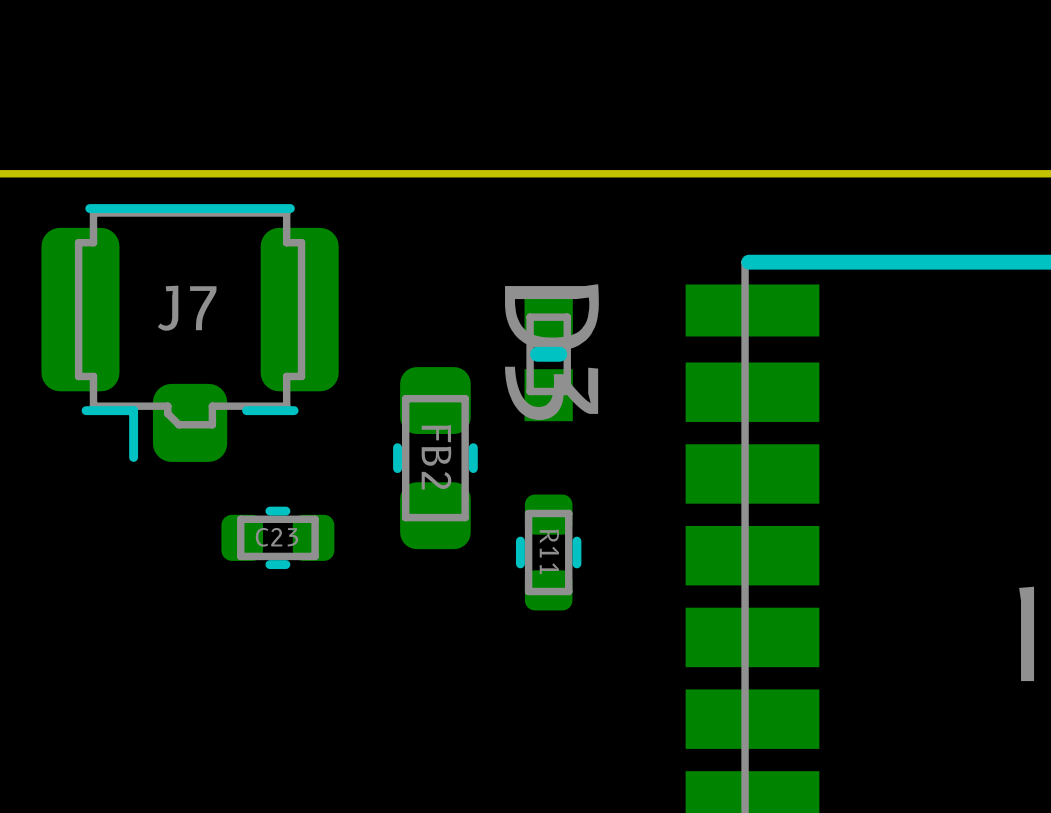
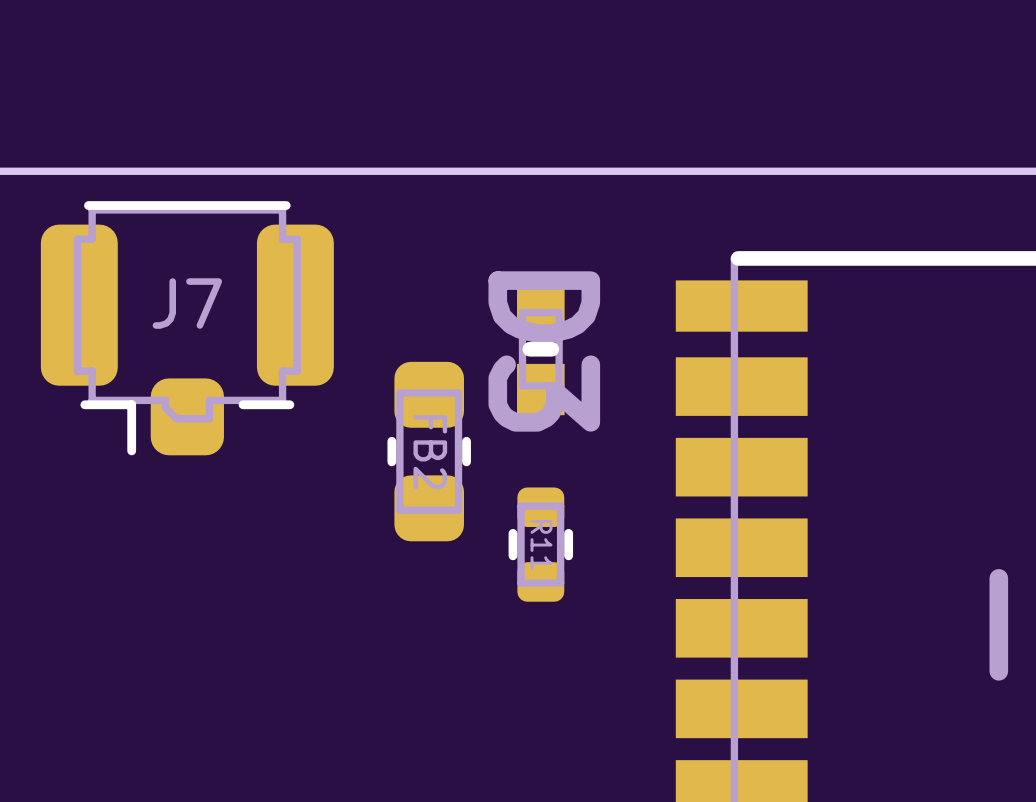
C23: (277, 537) -> none

